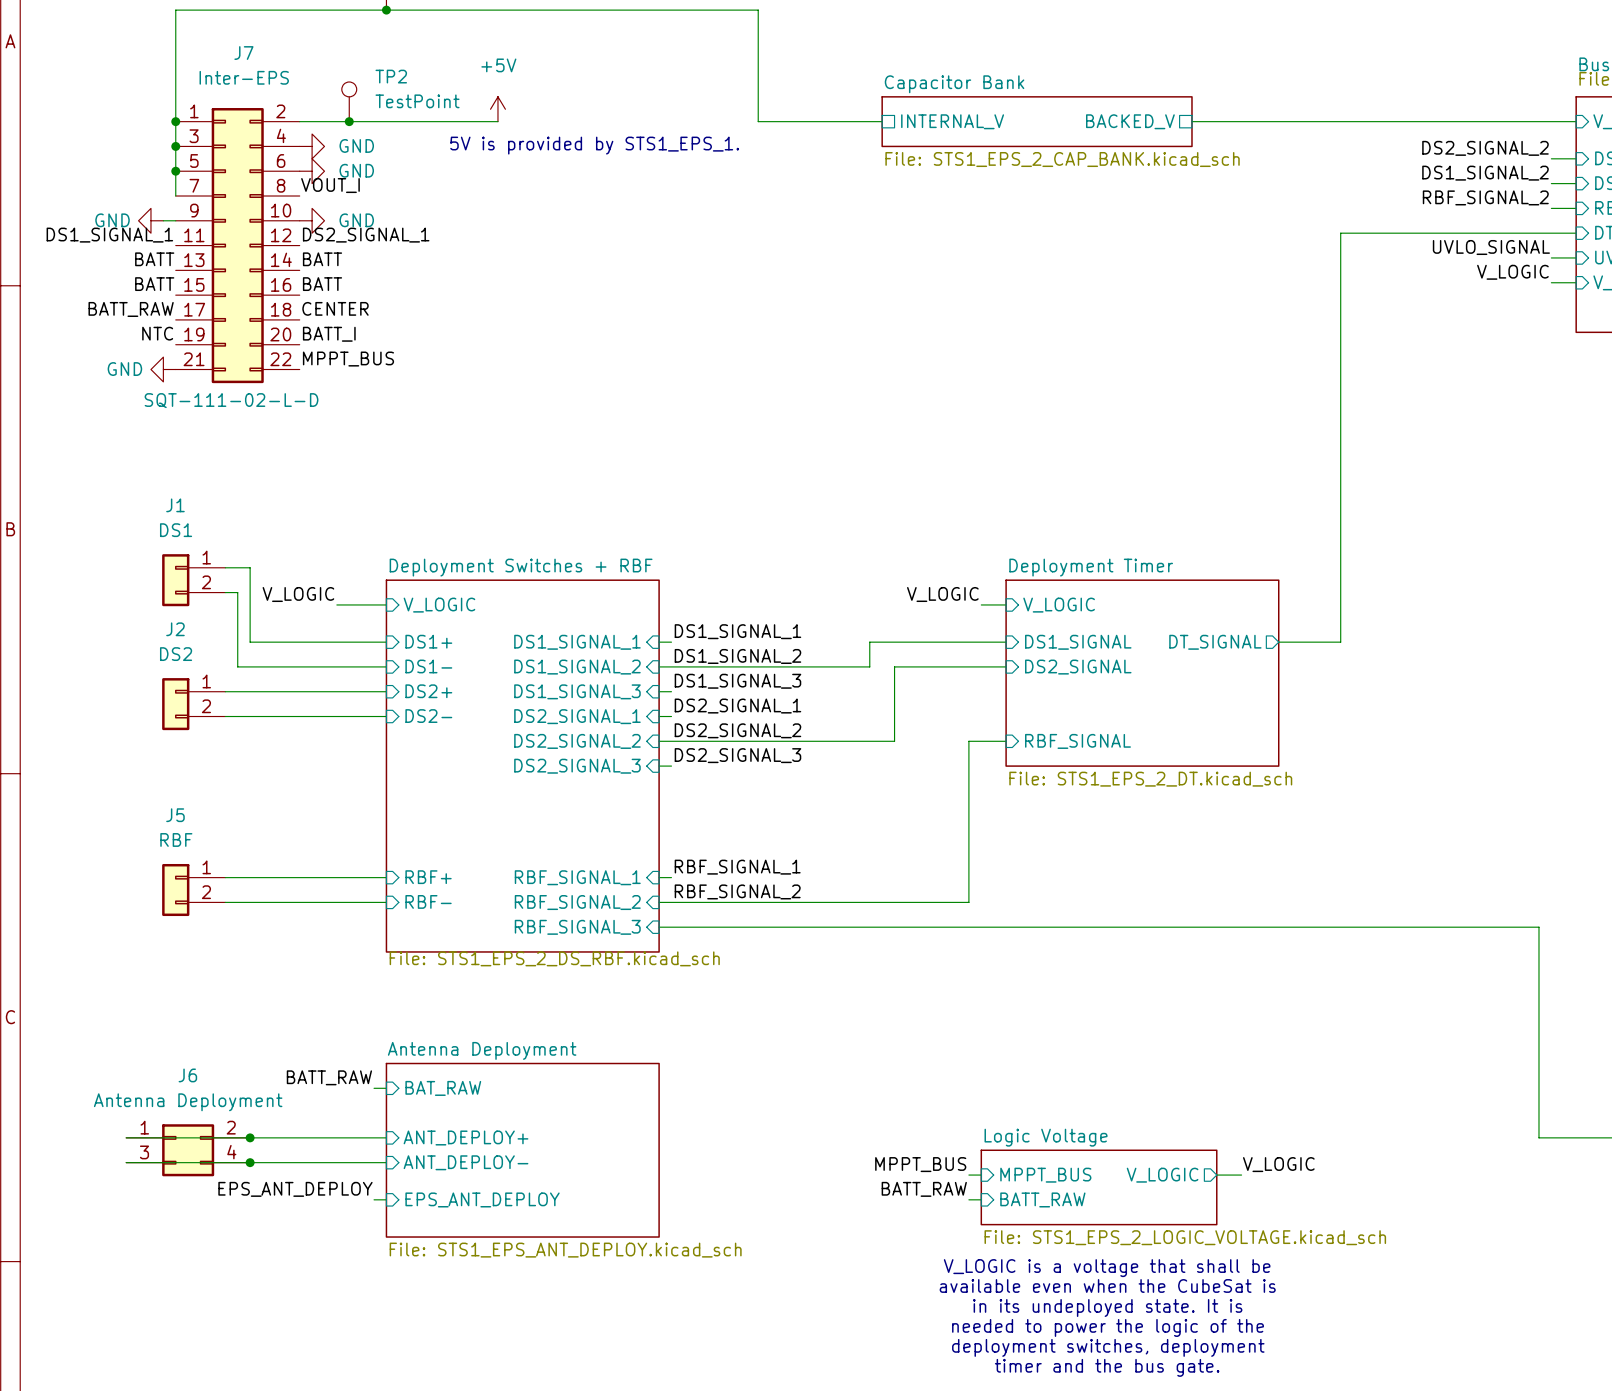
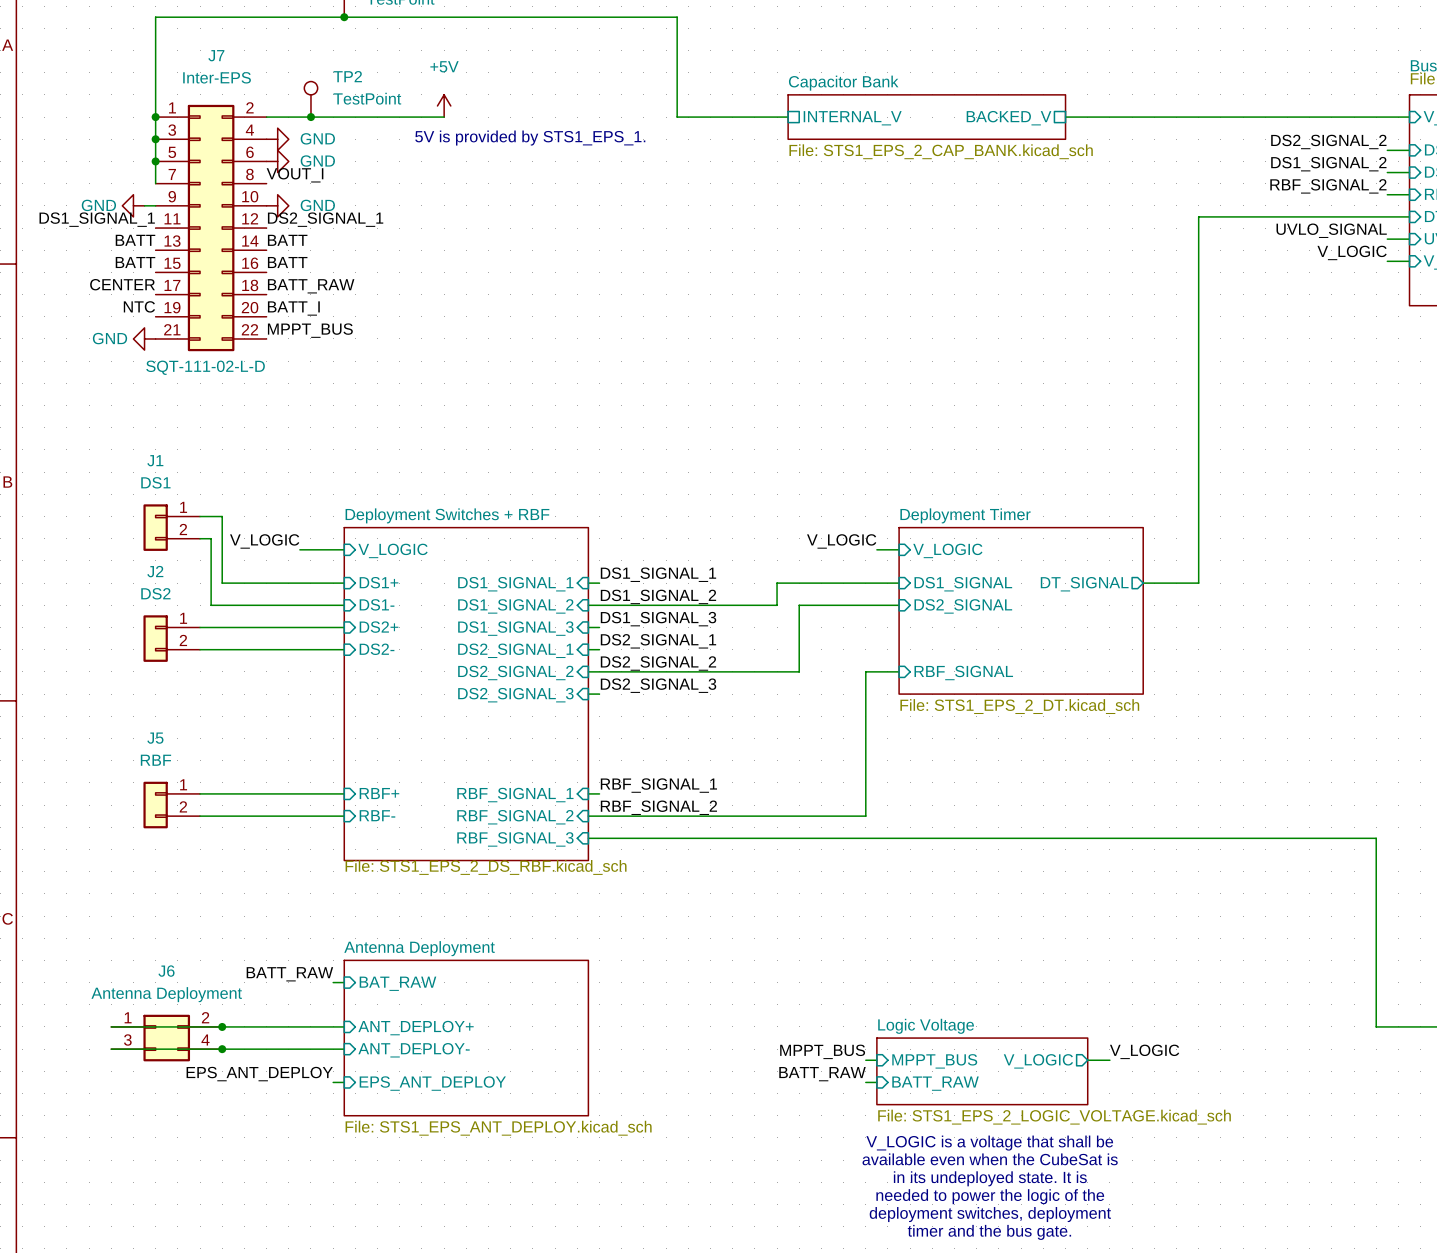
label: CENTER (335, 308) -> BATT_RAW (311, 286)
label: BATT_RAW (131, 309) -> CENTER (122, 284)

